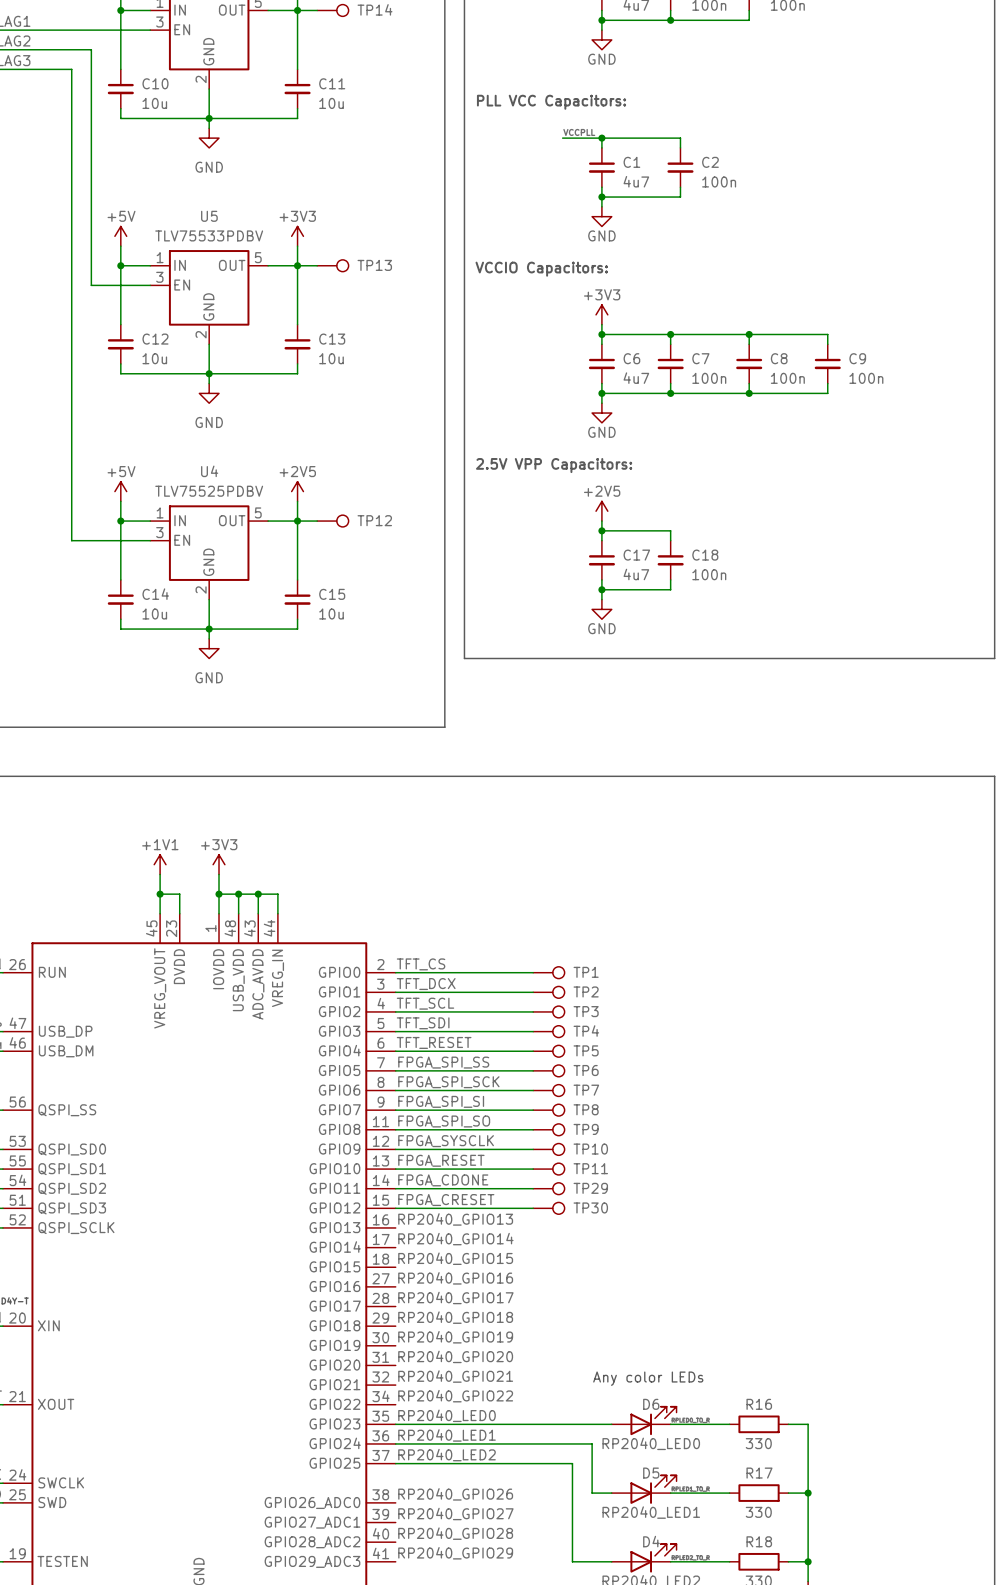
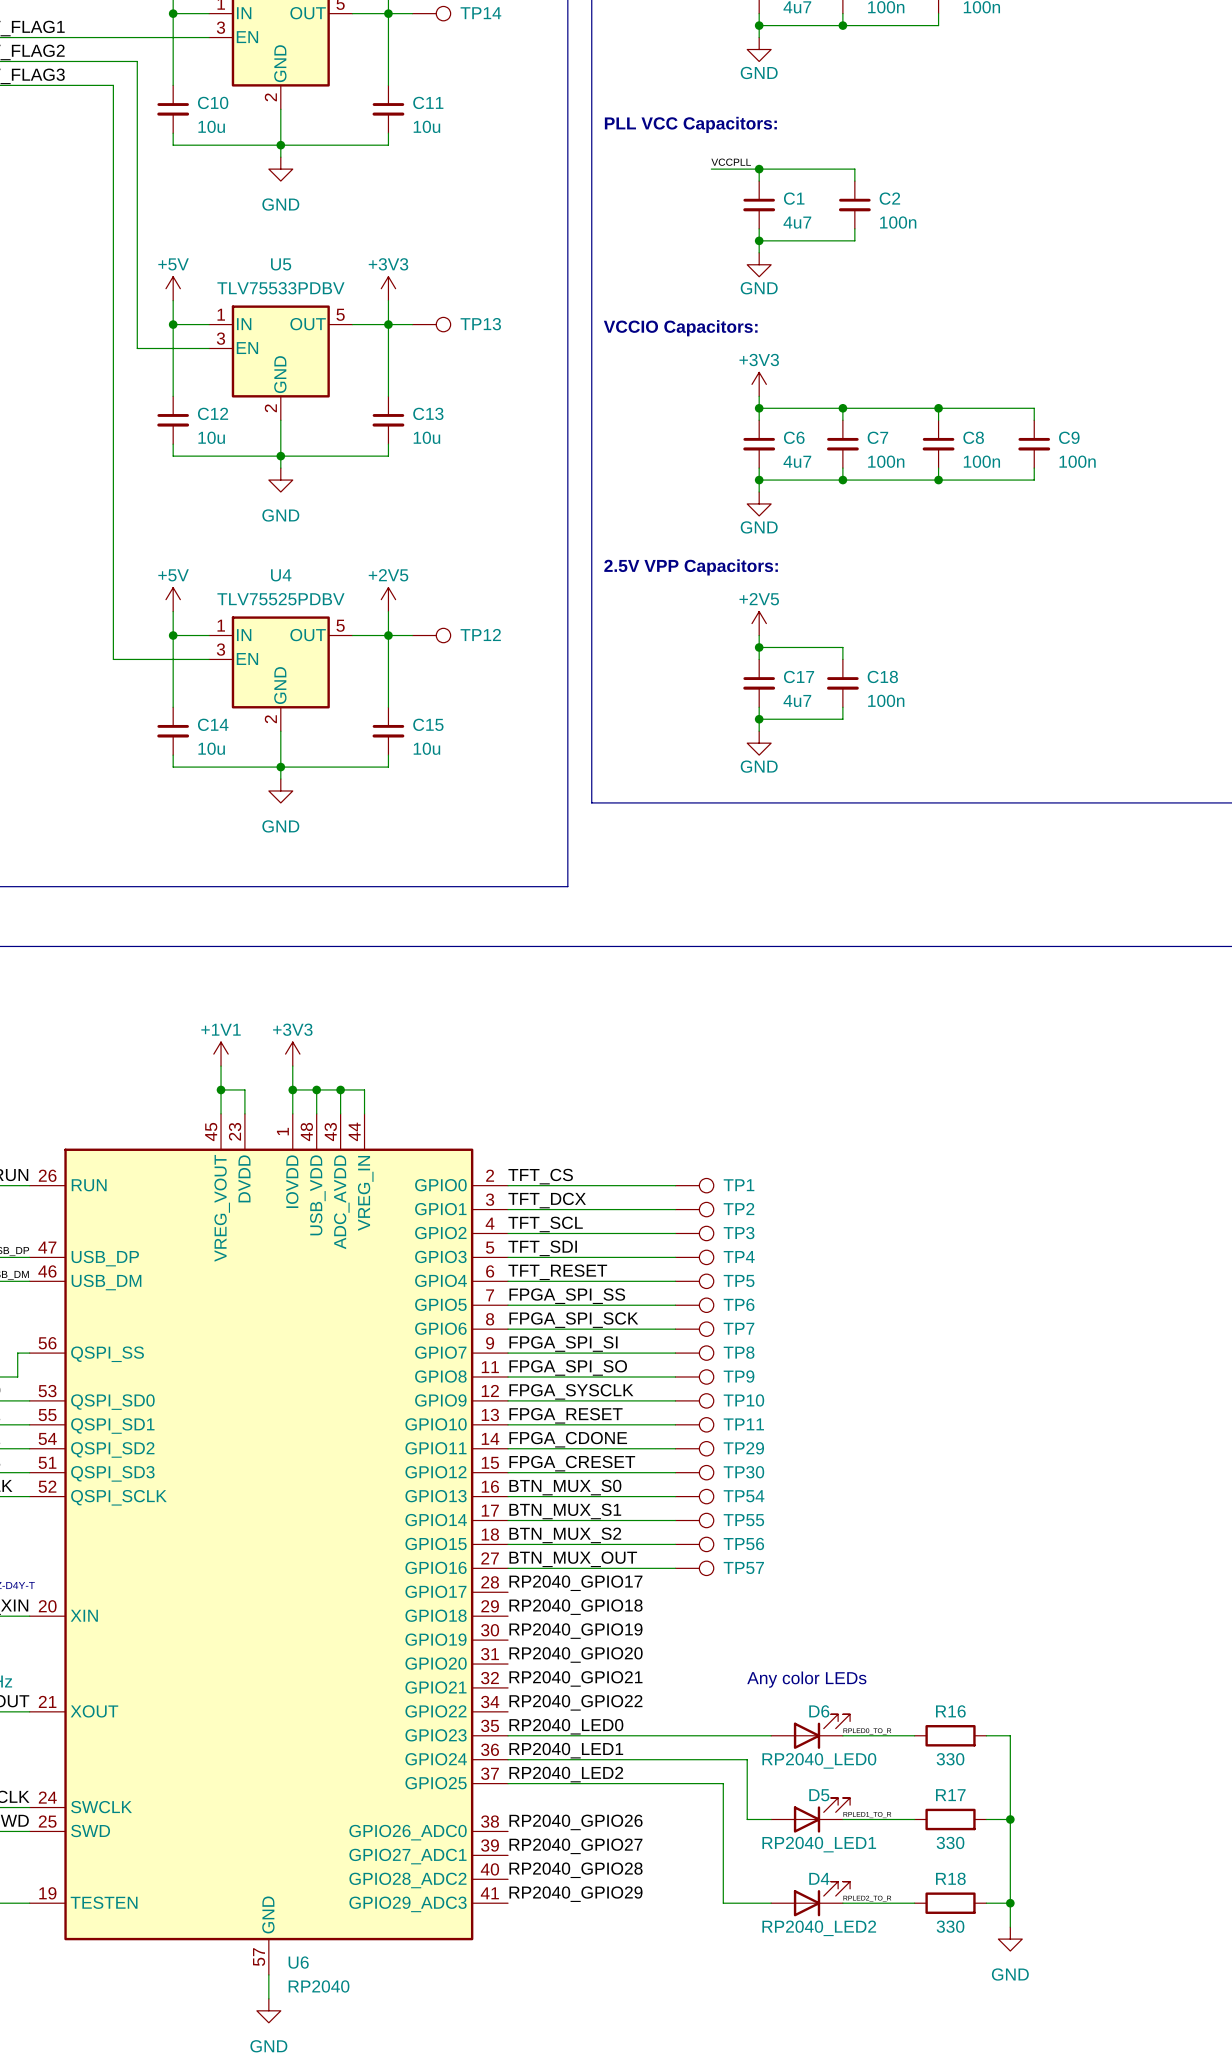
label: RP2040_GPIO13 (455, 1219) -> BTN_MUX_S0 (565, 1487)
wire: none -> (508, 1496) (675, 1496)
TP54: none -> (694, 1496)
label: RP2040_GPIO14 (455, 1239) -> BTN_MUX_S1 (565, 1511)
wire: none -> (508, 1520) (675, 1520)
TP55: none -> (694, 1520)
label: RP2040_GPIO15 (455, 1258) -> BTN_MUX_S2 (565, 1535)
wire: none -> (508, 1544) (675, 1544)
TP56: none -> (694, 1544)
label: RP2040_GPIO16 (455, 1278) -> BTN_MUX_OUT (573, 1559)
wire: none -> (508, 1568) (675, 1568)
TP57: none -> (694, 1568)

